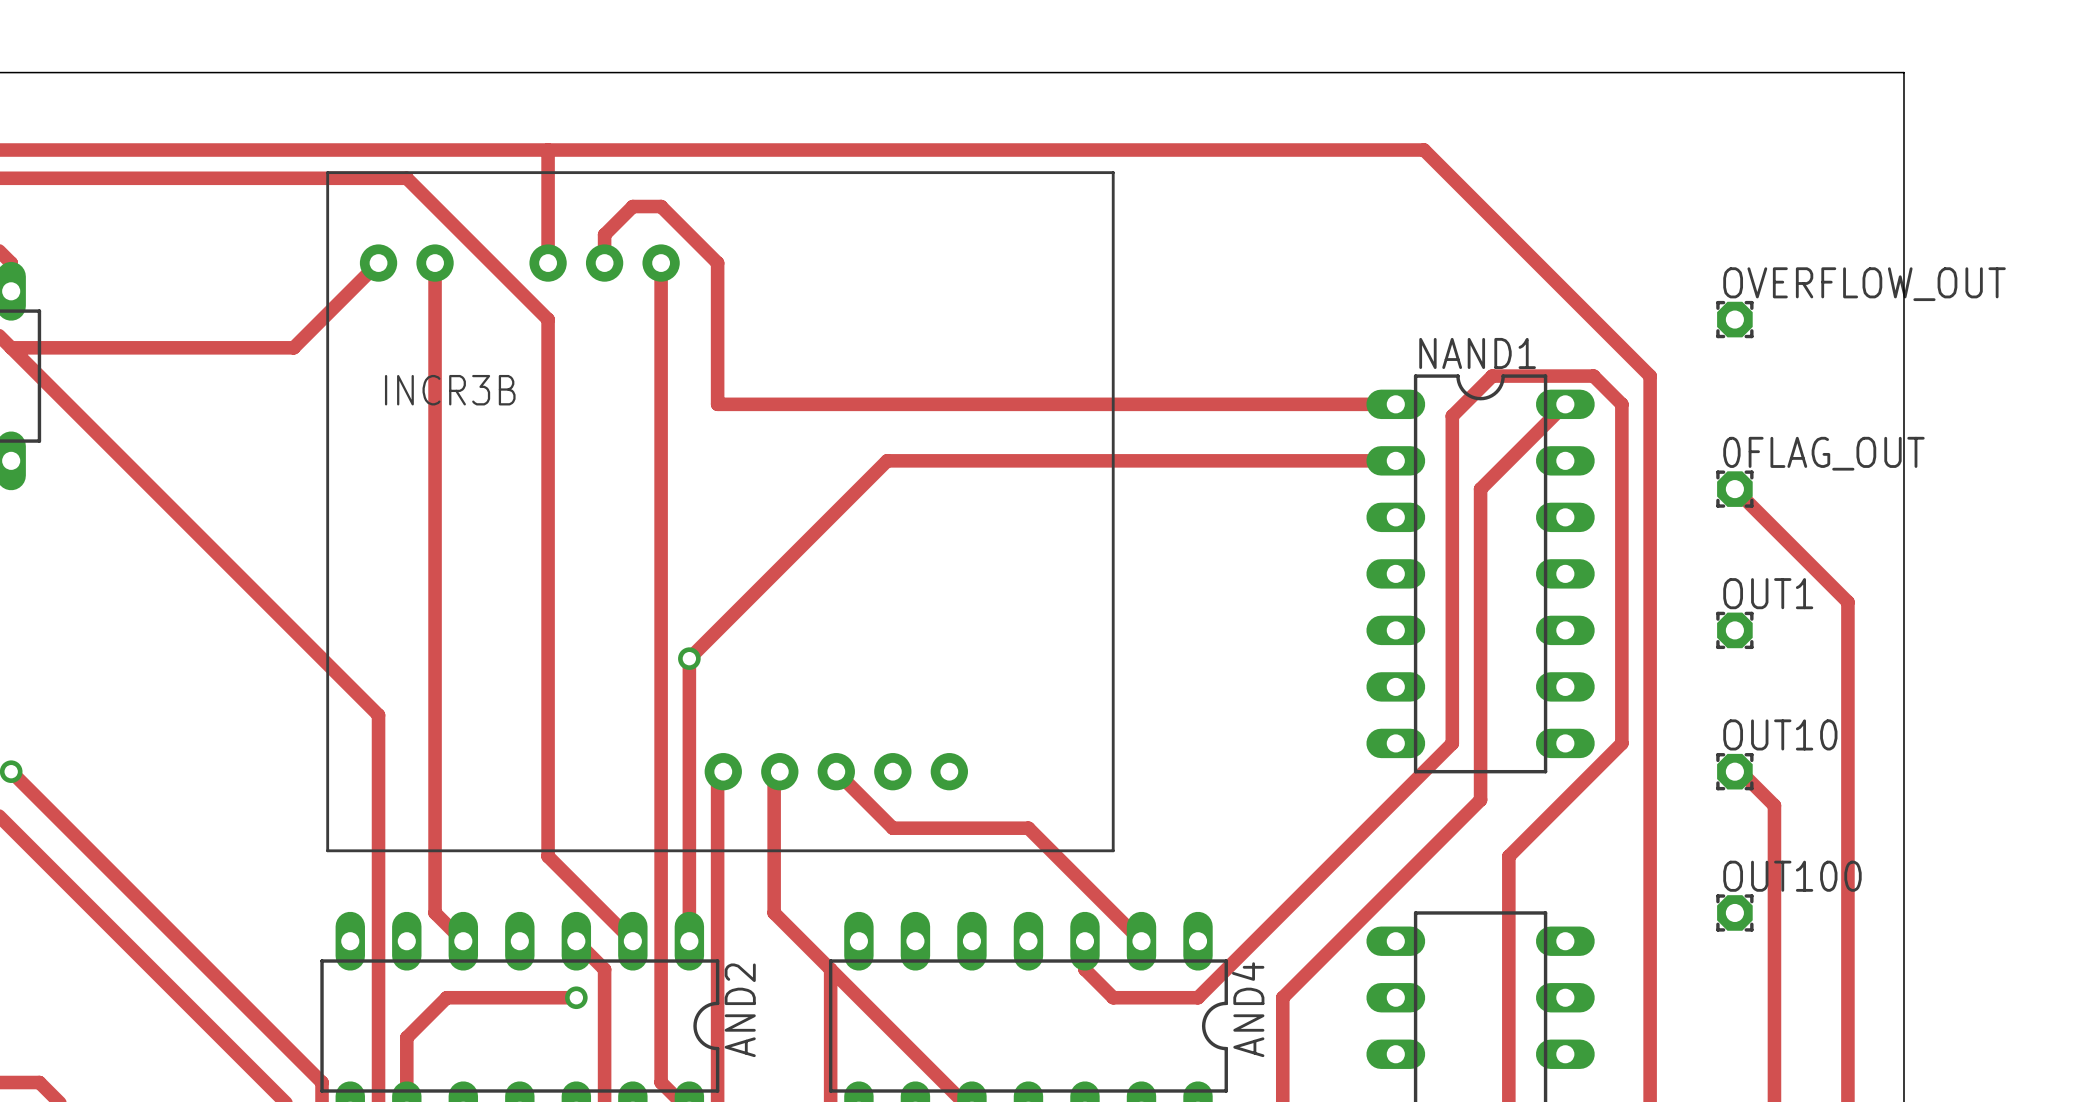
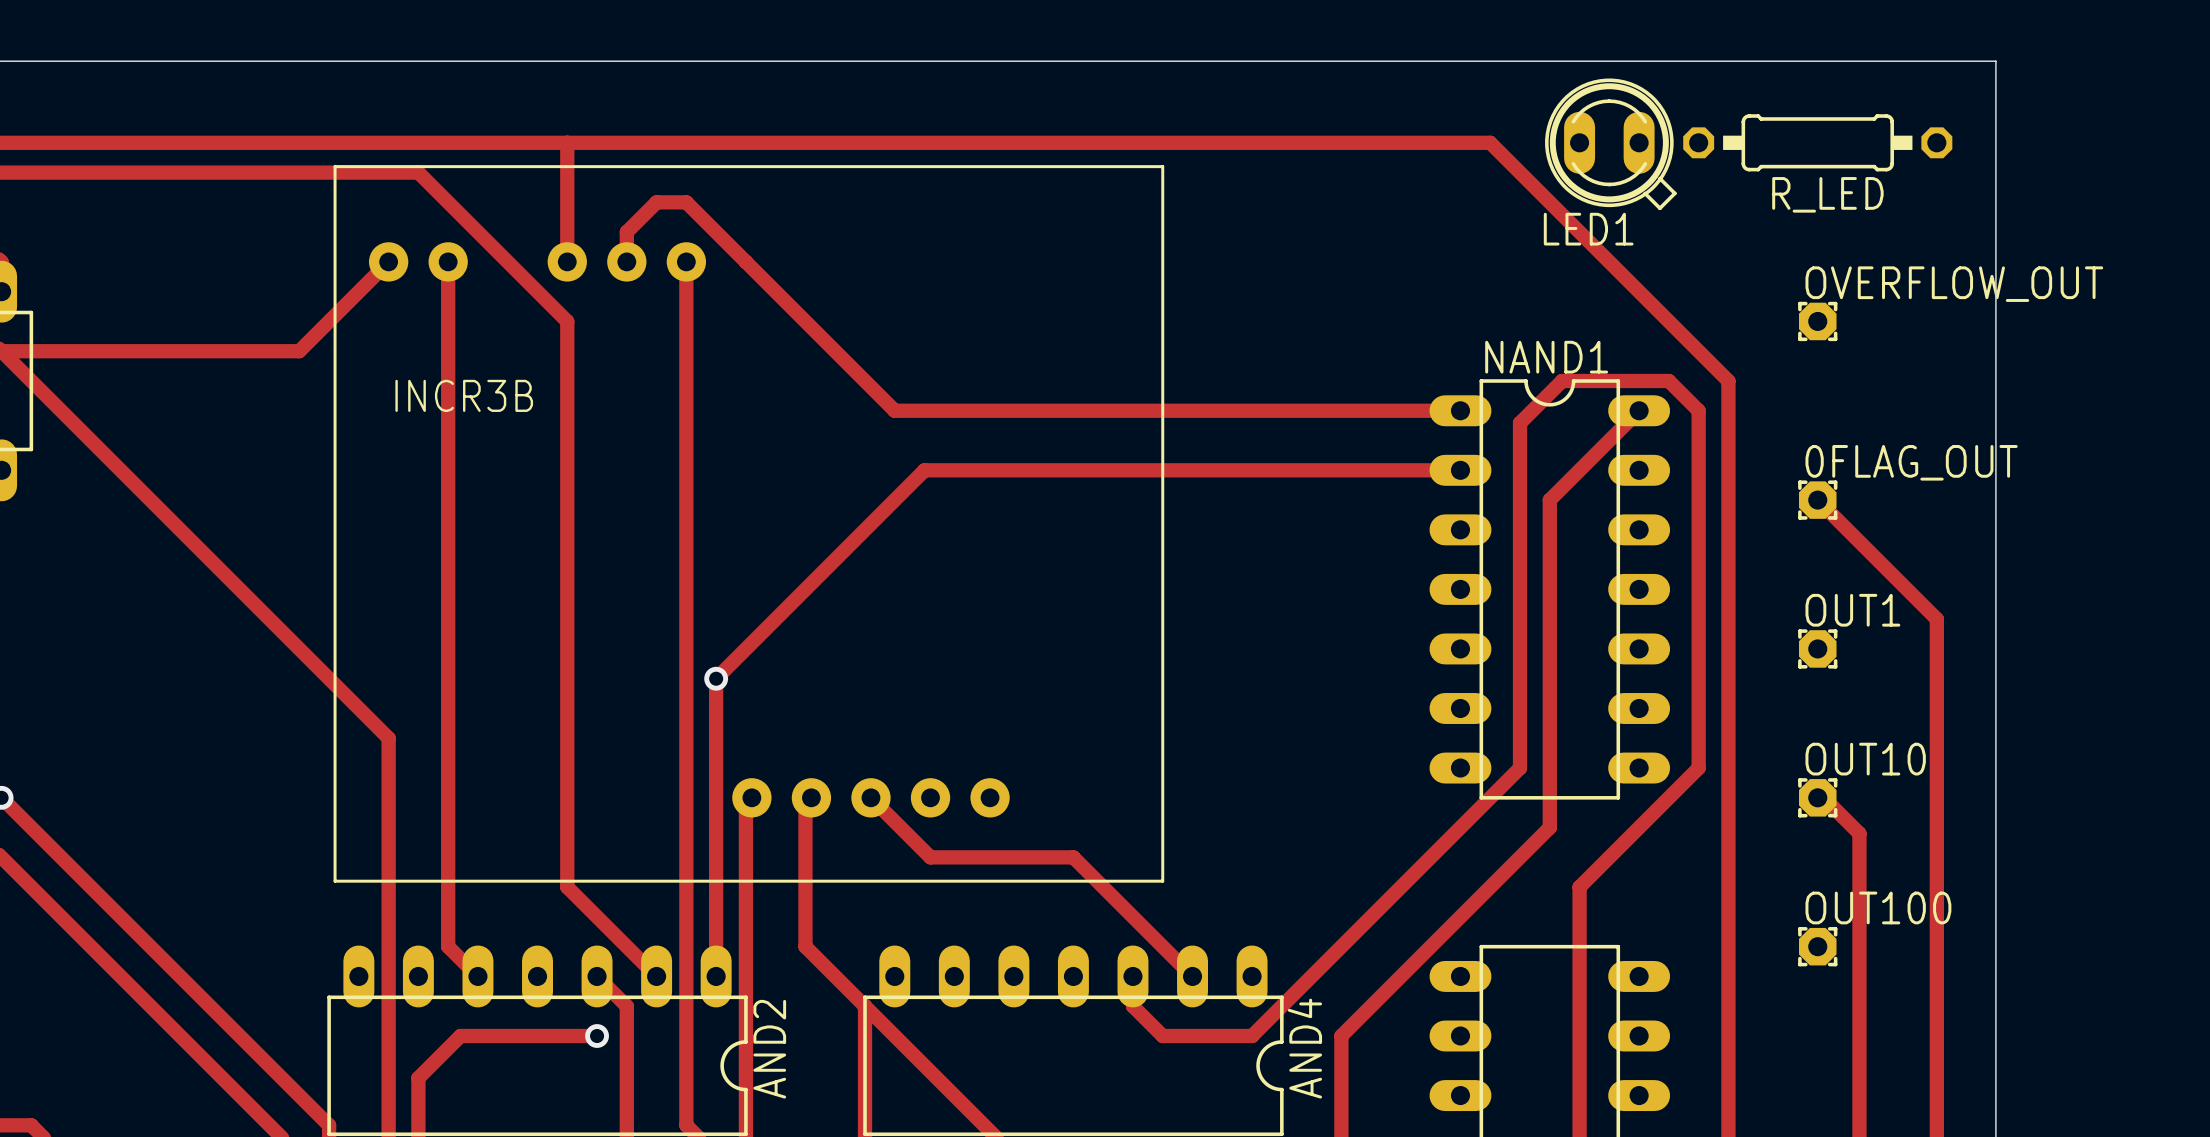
R_LED: none -> (1817, 142)
LED1: none -> (1610, 144)
track: (717, 263) (717, 404) (858, 404) -> (745, 261) (894, 410)

